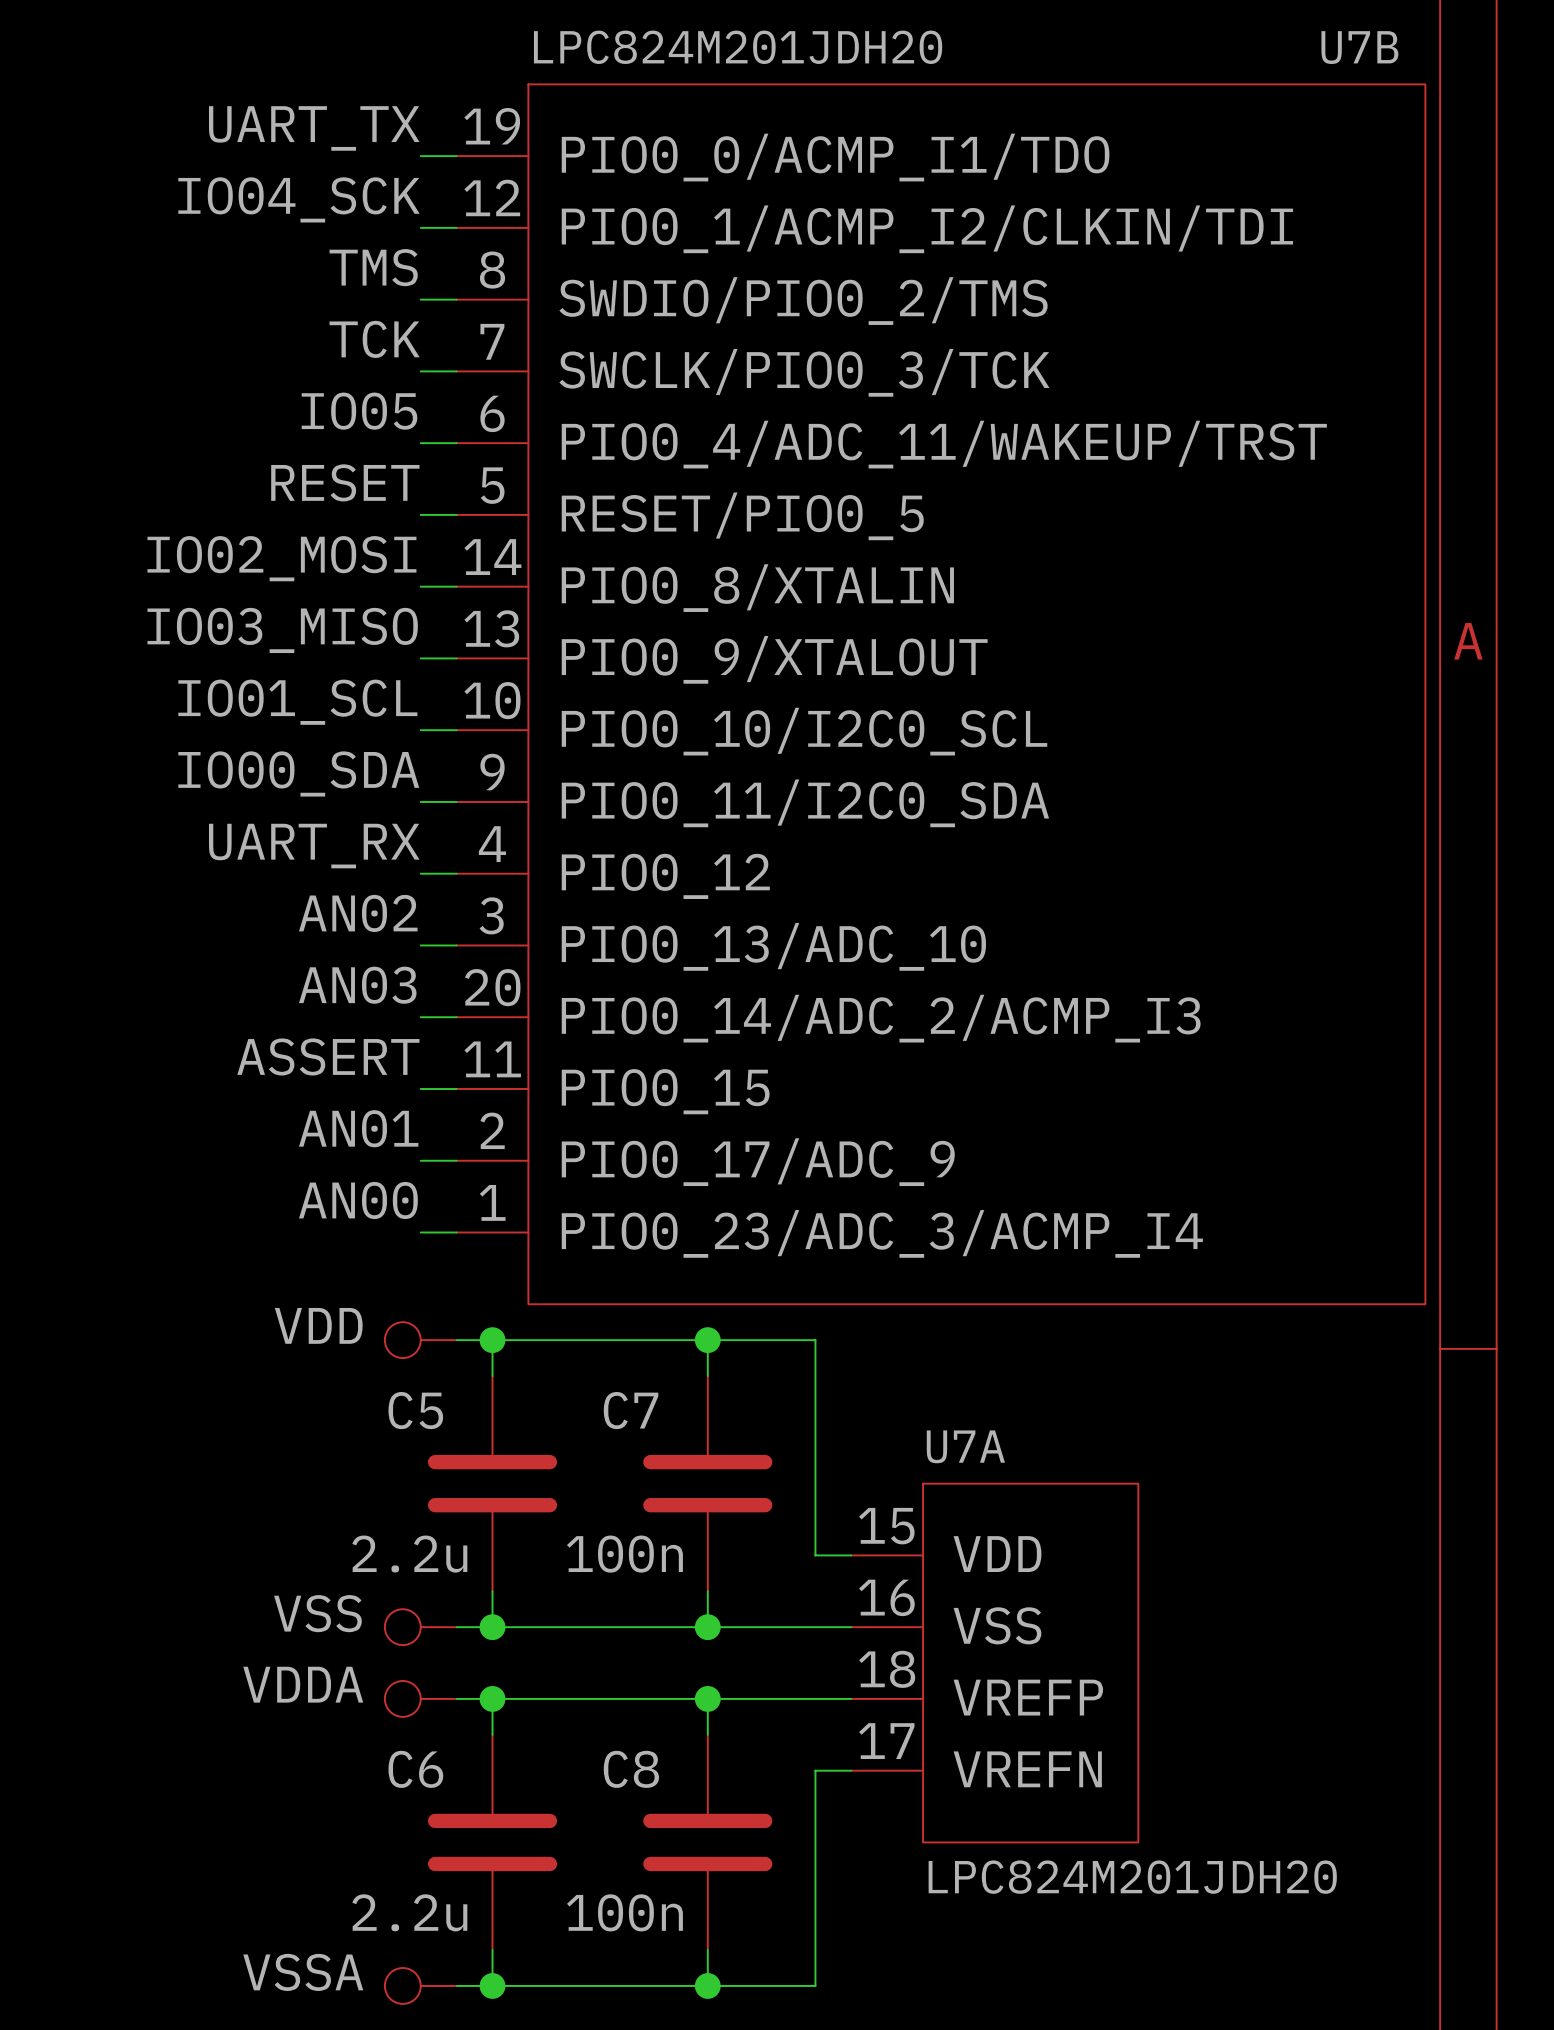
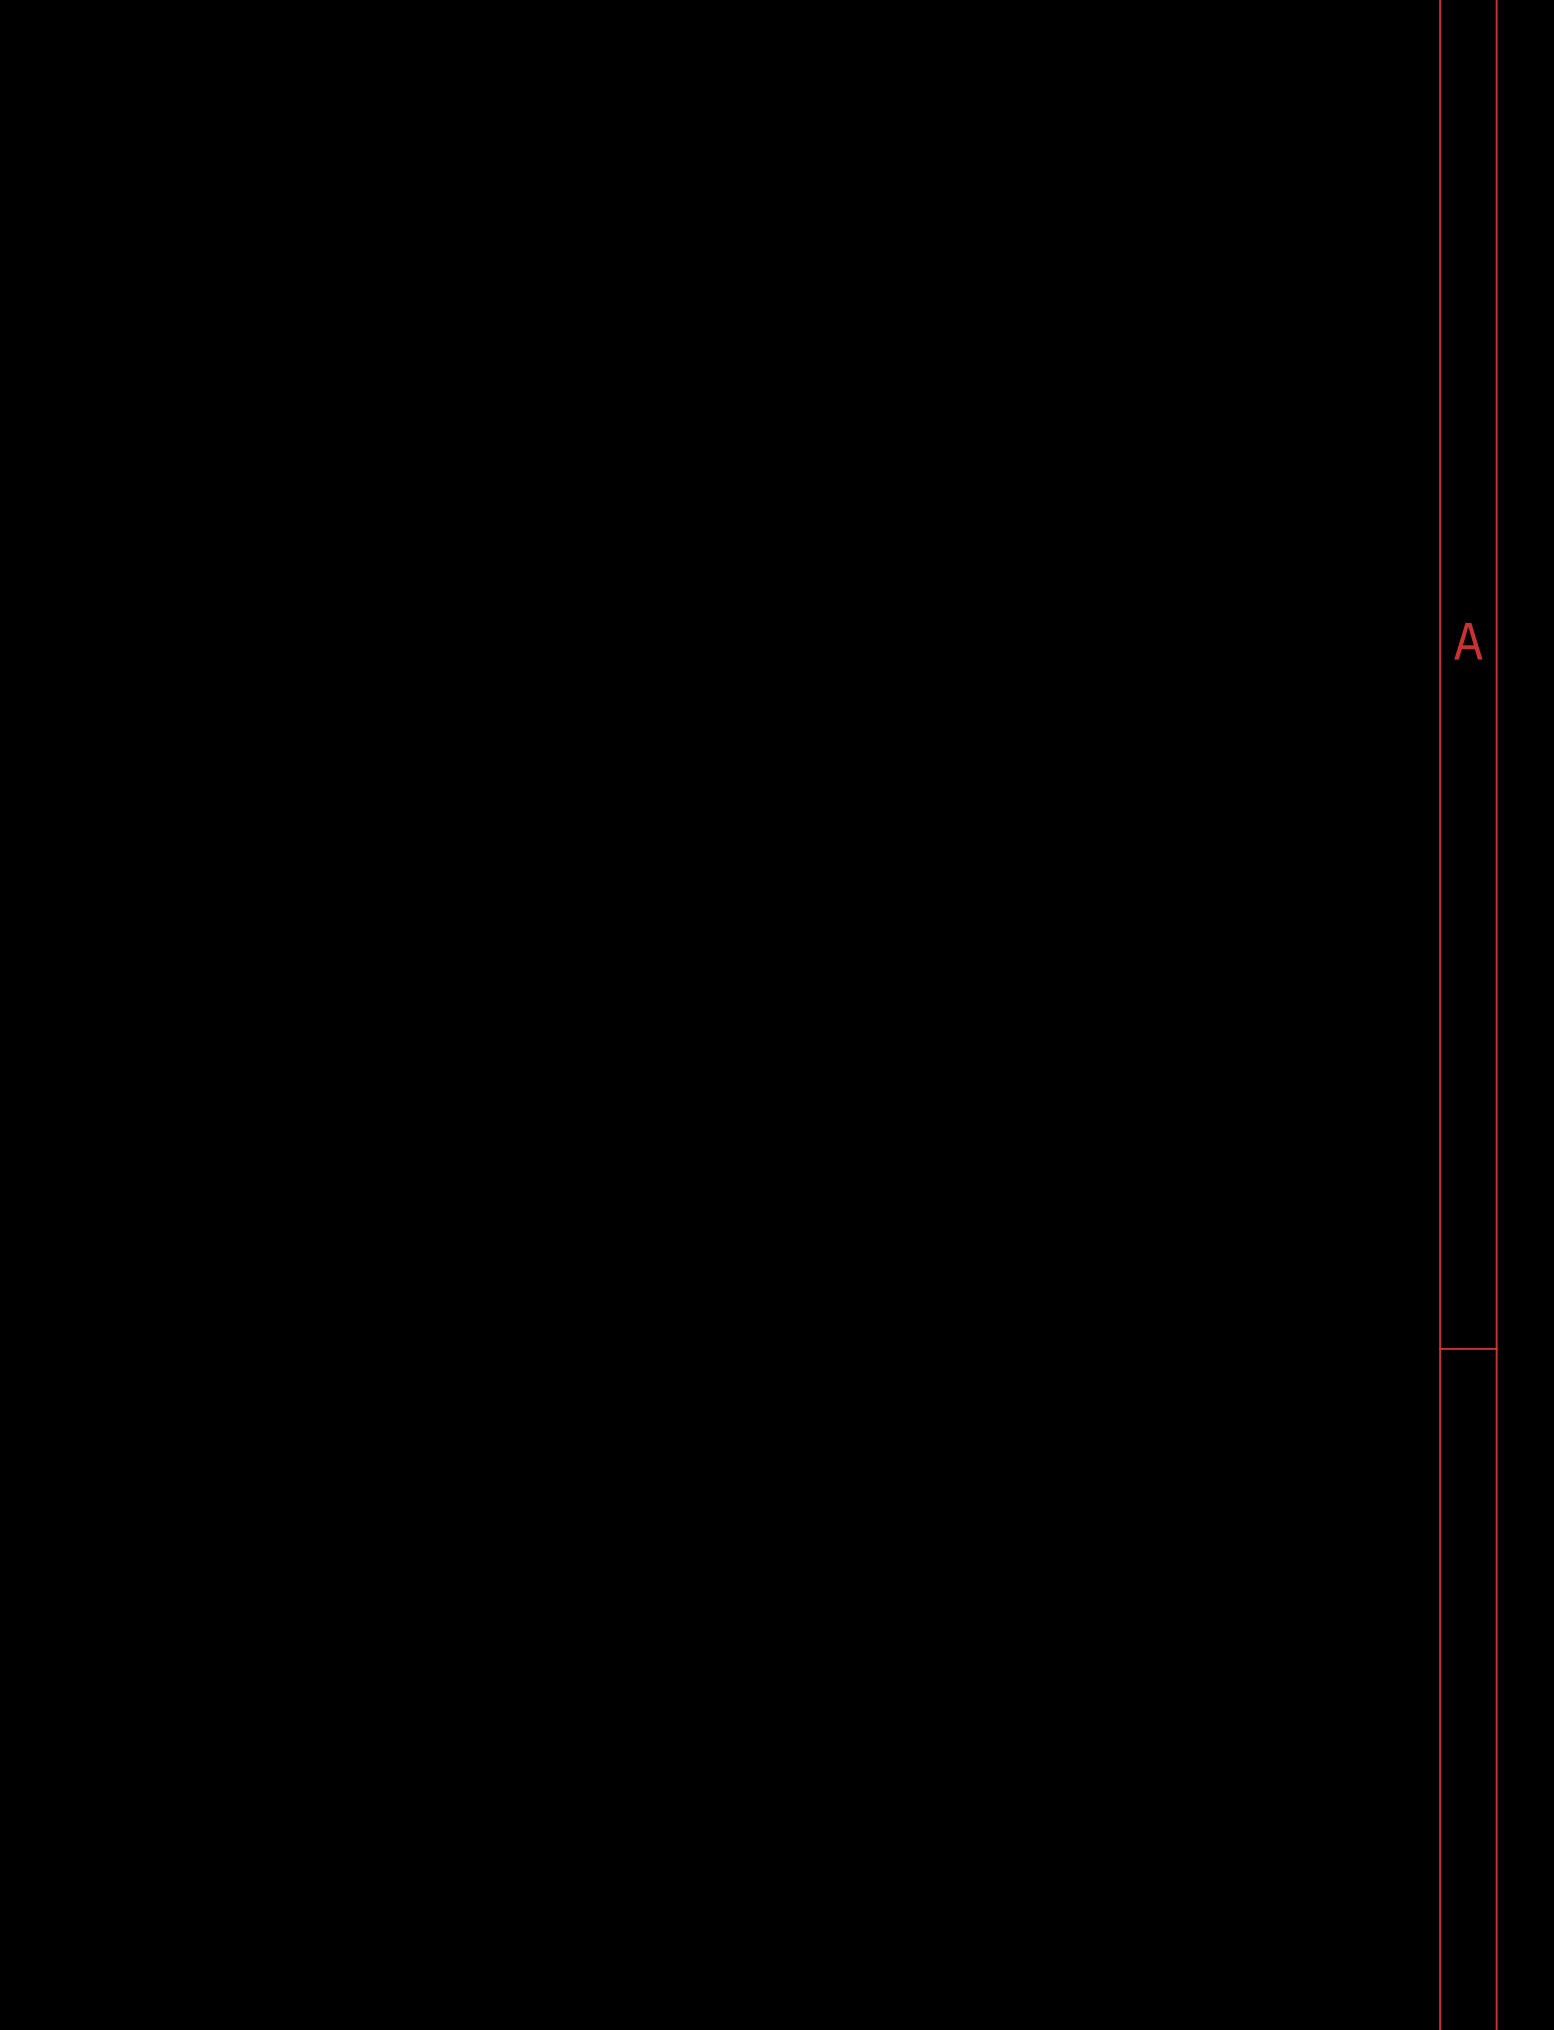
label: UART_TX (314, 128) -> none
wire: (420, 156) (456, 156) -> none
label: IO04_SCK (298, 199) -> none
wire: (420, 227) (456, 227) -> none
label: TMS (373, 267) -> none
wire: (420, 299) (456, 299) -> none
label: TCK (374, 339) -> none
wire: (420, 371) (456, 371) -> none
label: IO05 (359, 411) -> none
wire: (420, 443) (456, 443) -> none
label: RESET (345, 482) -> none
wire: (420, 514) (456, 514) -> none
label: IO02_MOSI (281, 558) -> none
wire: (420, 586) (456, 586) -> none
label: IO03_MISO (282, 630) -> none
wire: (420, 658) (456, 658) -> none
U7B: LPC824M201JDH20 (941, 694) -> none
label: IO01_SCL (297, 702) -> none
wire: (420, 730) (456, 730) -> none
label: IO00_SDA (298, 773) -> none
wire: (420, 801) (456, 801) -> none
label: UART_RX (314, 846) -> none
wire: (420, 873) (456, 873) -> none
label: AN02 (358, 913) -> none
wire: (420, 945) (456, 945) -> none
label: AN03 (357, 985) -> none
wire: (420, 1017) (456, 1017) -> none
label: ASSERT (328, 1056) -> none
wire: (420, 1088) (456, 1088) -> none
label: AN01 (358, 1128) -> none
wire: (420, 1160) (456, 1160) -> none
label: AN00 (358, 1200) -> none
wire: (420, 1232) (456, 1232) -> none
power symbol: VDD (420, 1340) -> none
wire: (456, 1340) (815, 1340) (815, 1555) (851, 1555) -> none
wire: (492, 1340) (492, 1376) -> none
junction: (492, 1340) -> none
wire: (707, 1340) (707, 1376) -> none
junction: (707, 1340) -> none
C5: 2.2u (492, 1483) -> none
C7: 100n (707, 1483) -> none
wire: (492, 1591) (492, 1627) -> none
wire: (707, 1591) (707, 1627) -> none
power symbol: VSS (420, 1627) -> none
wire: (456, 1627) (851, 1627) -> none
junction: (492, 1627) -> none
junction: (707, 1627) -> none
U7A: LPC824M201JDH20 (994, 1663) -> none
power symbol: VDDA (420, 1698) -> none
wire: (456, 1698) (851, 1698) -> none
wire: (492, 1698) (492, 1734) -> none
junction: (492, 1698) -> none
wire: (707, 1698) (707, 1734) -> none
junction: (707, 1698) -> none
wire: (851, 1770) (815, 1770) (815, 1985) (456, 1985) -> none
C6: 2.2u (492, 1842) -> none
C8: 100n (707, 1842) -> none
wire: (492, 1950) (492, 1985) -> none
wire: (707, 1950) (707, 1985) -> none
power symbol: VSSA (420, 1985) -> none
junction: (492, 1985) -> none
junction: (707, 1985) -> none

